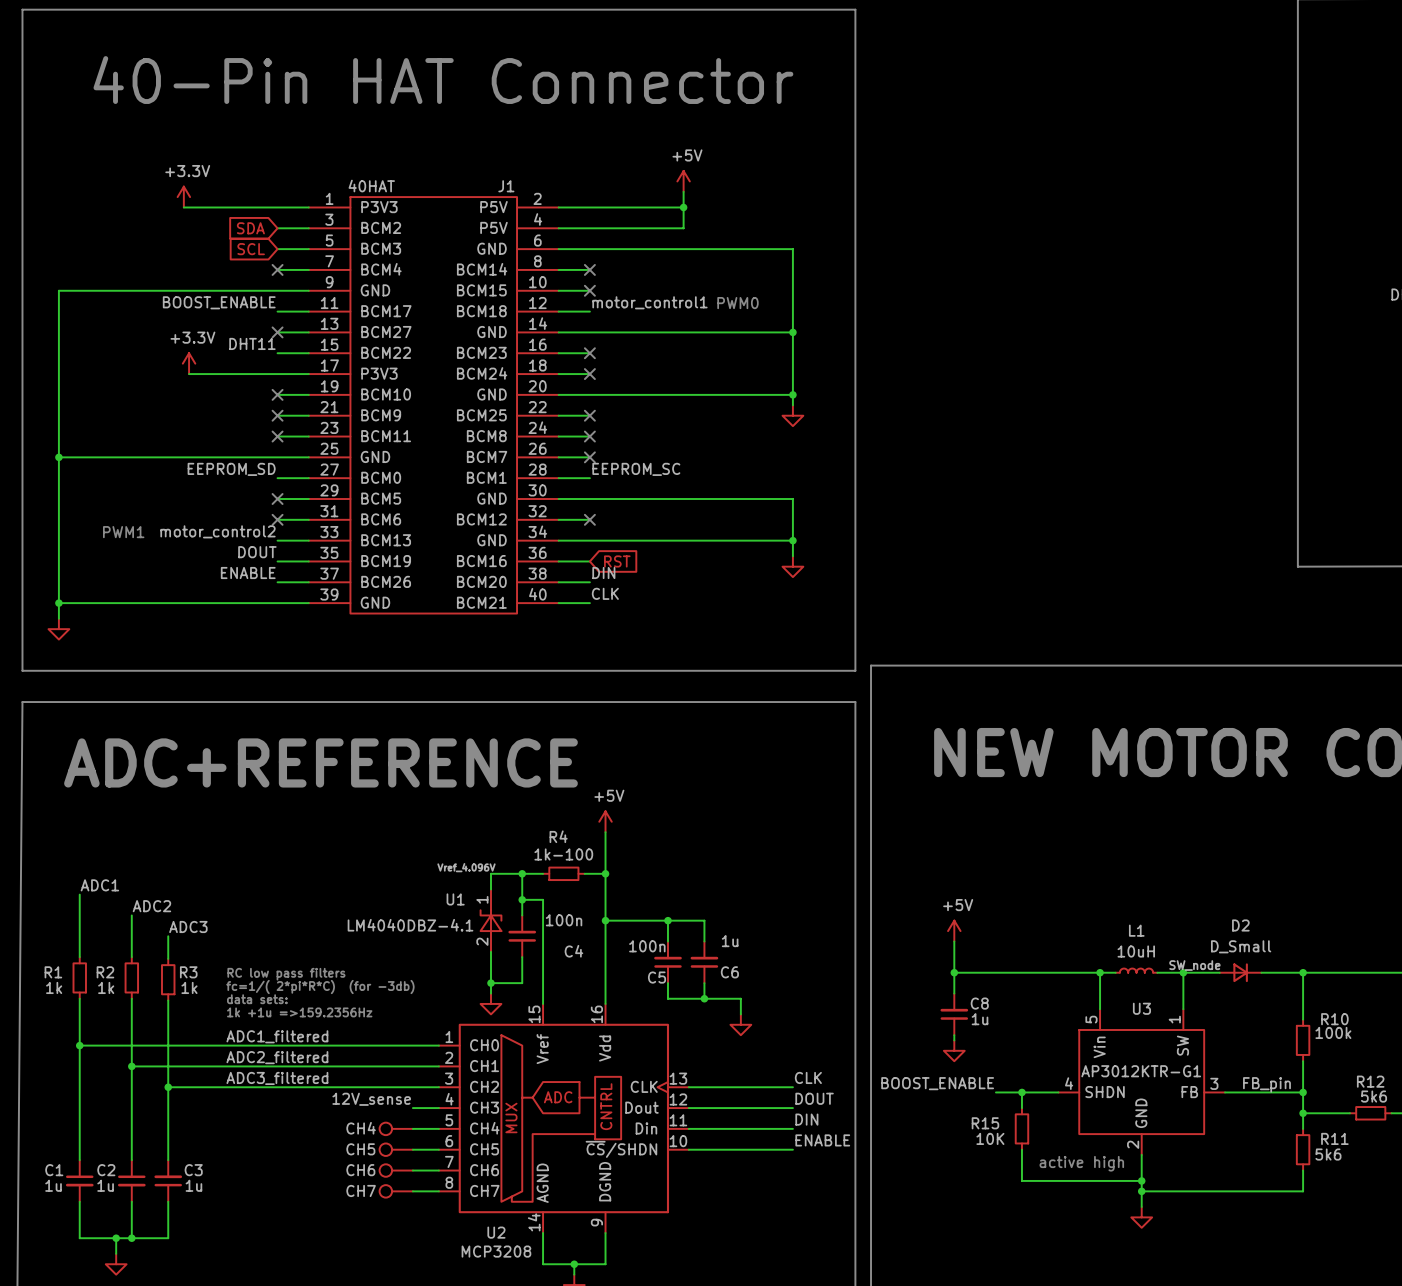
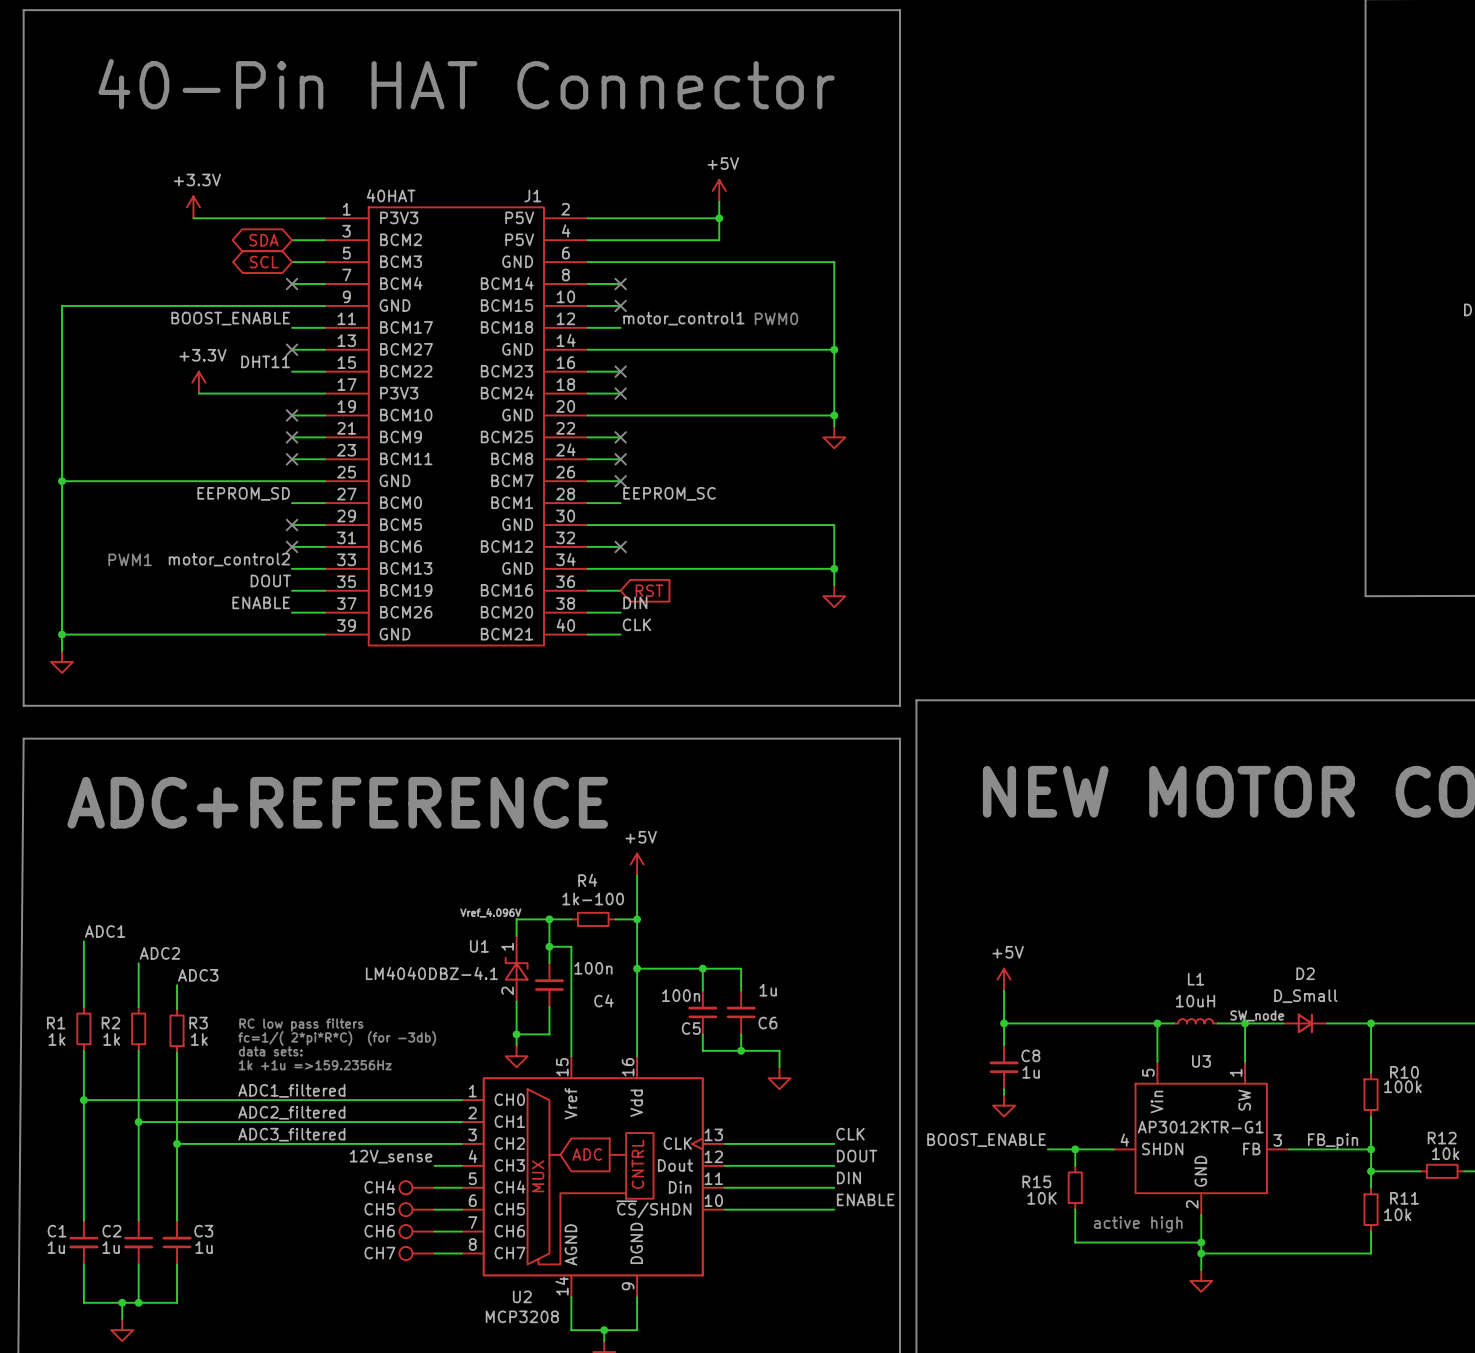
global label shape: input (250, 228) -> bidirectional (263, 240)
global label shape: input (251, 249) -> bidirectional (264, 262)
R12 value: 5k6 (1374, 1096) -> 10k (1445, 1153)
R11 value: 5k6 (1328, 1154) -> 10k (1397, 1214)

